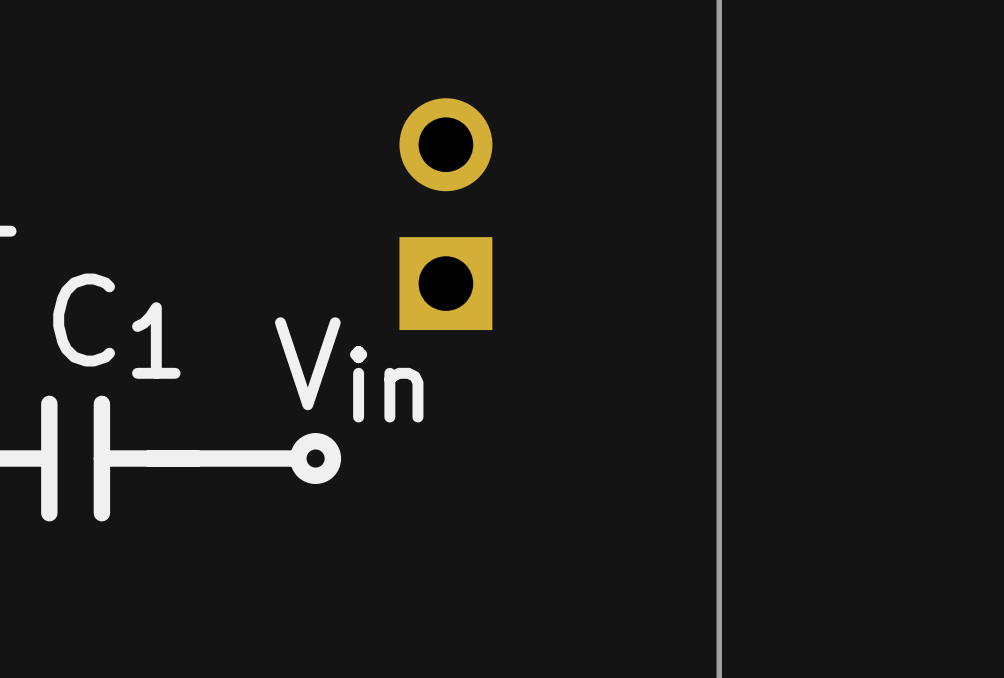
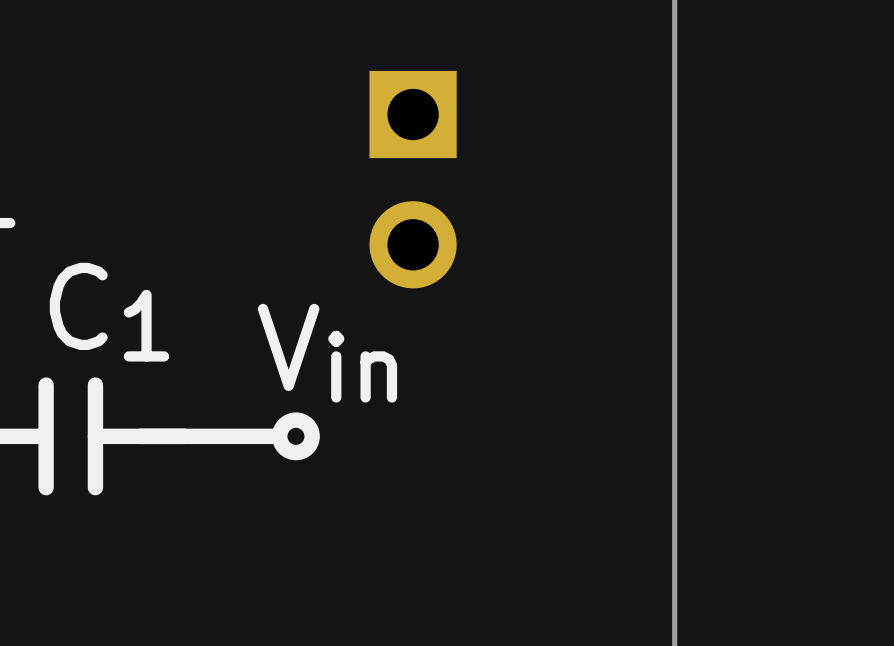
part rotation: 0° (445, 214) -> 180° (413, 179)

